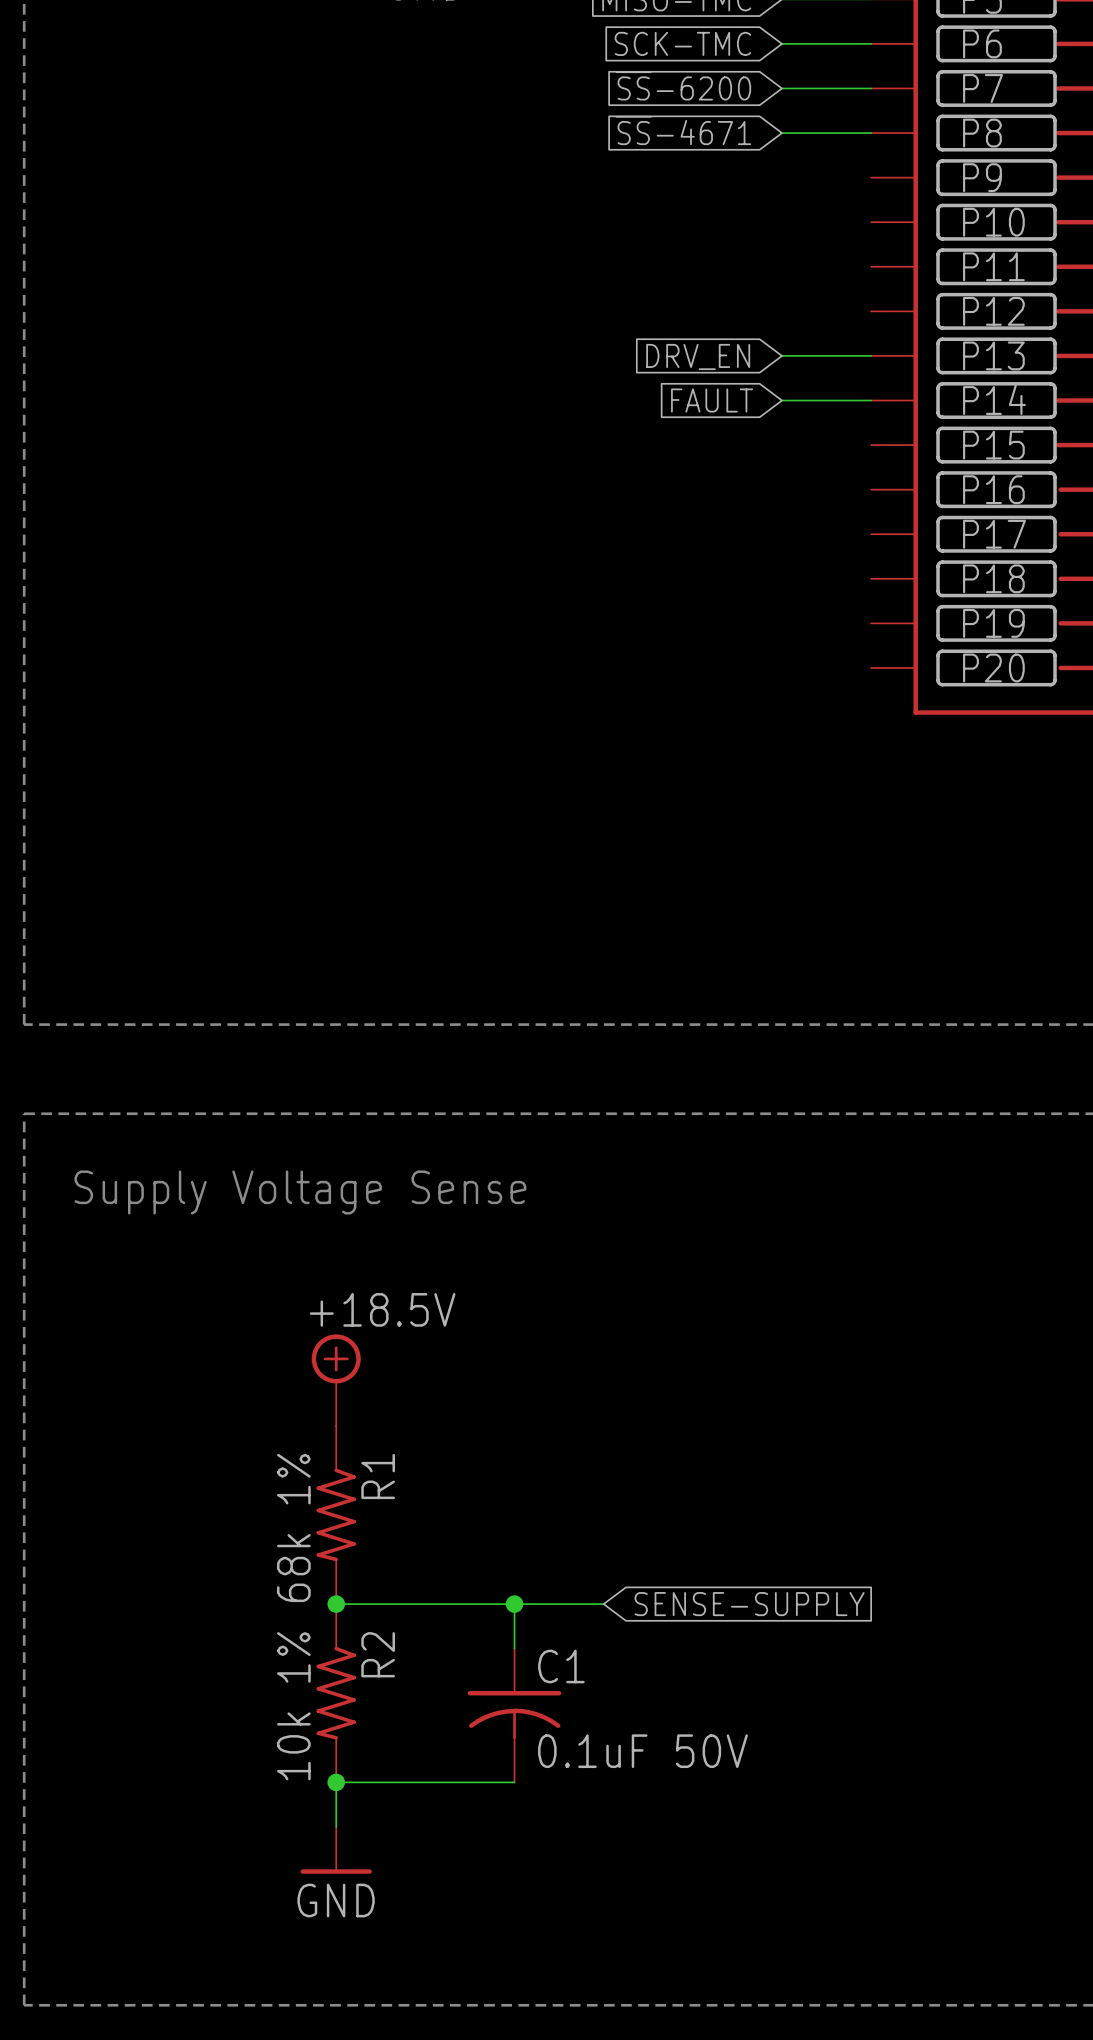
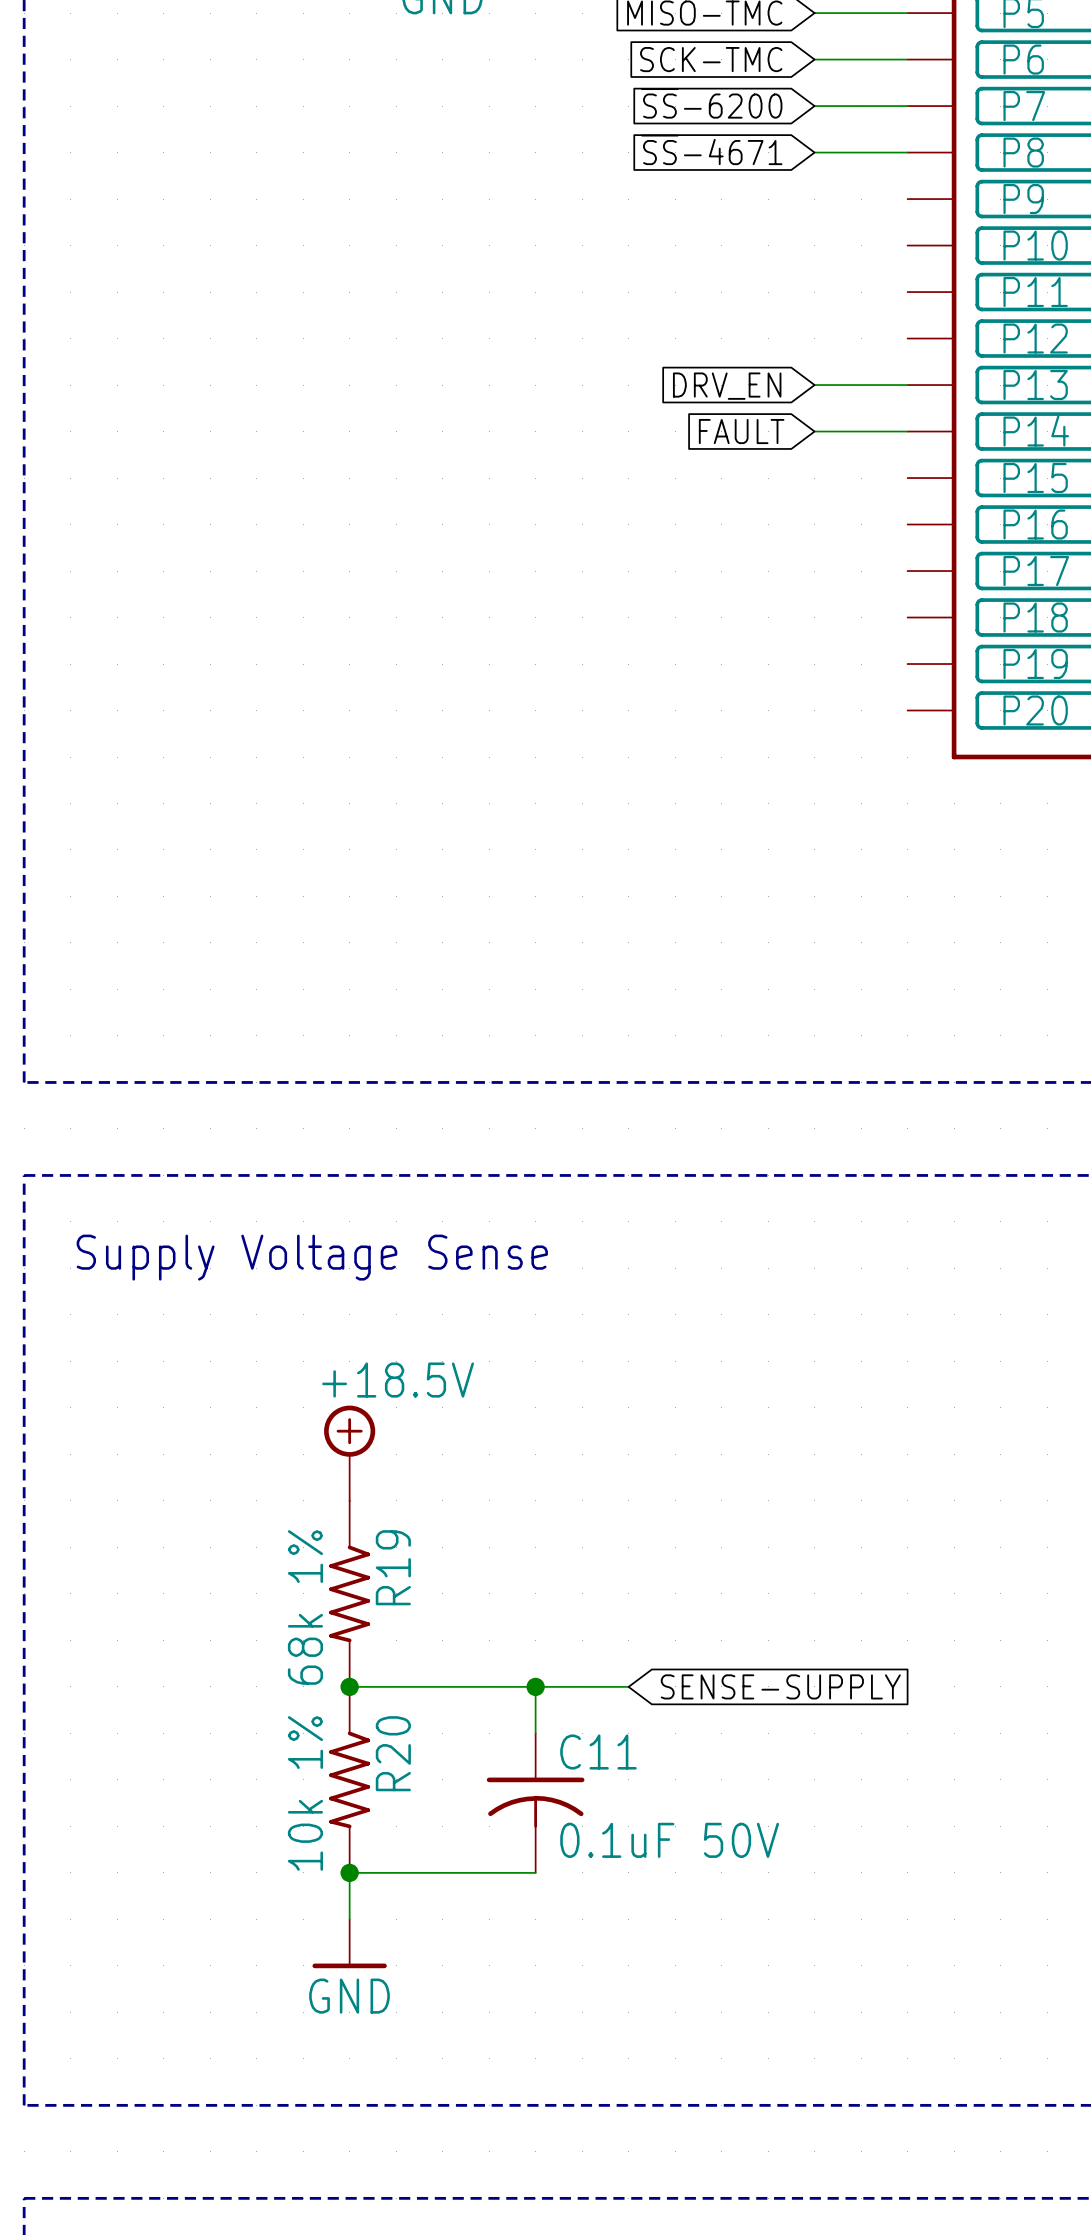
R1 name: R1 (378, 1476) -> R19 (393, 1567)
R2 name: R2 (378, 1654) -> R20 (393, 1753)
C1 name: C1 (561, 1666) -> C11 (598, 1752)

